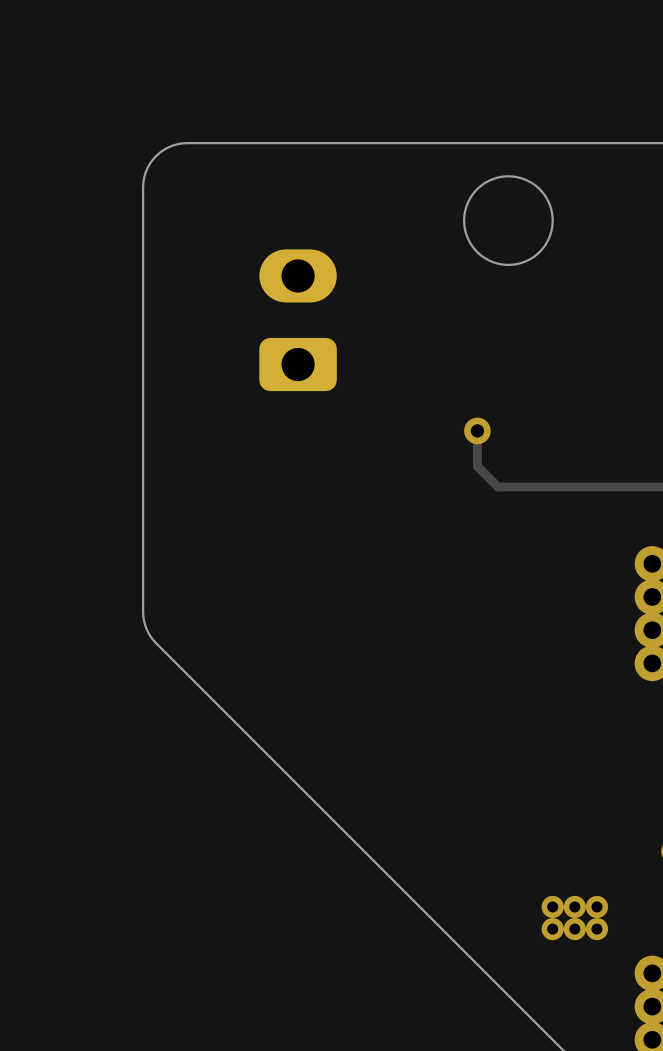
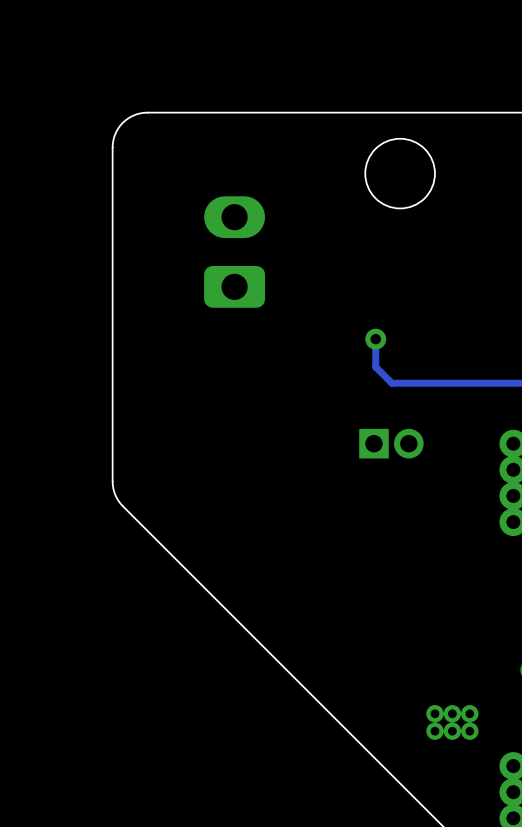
part: none -> (391, 443)

